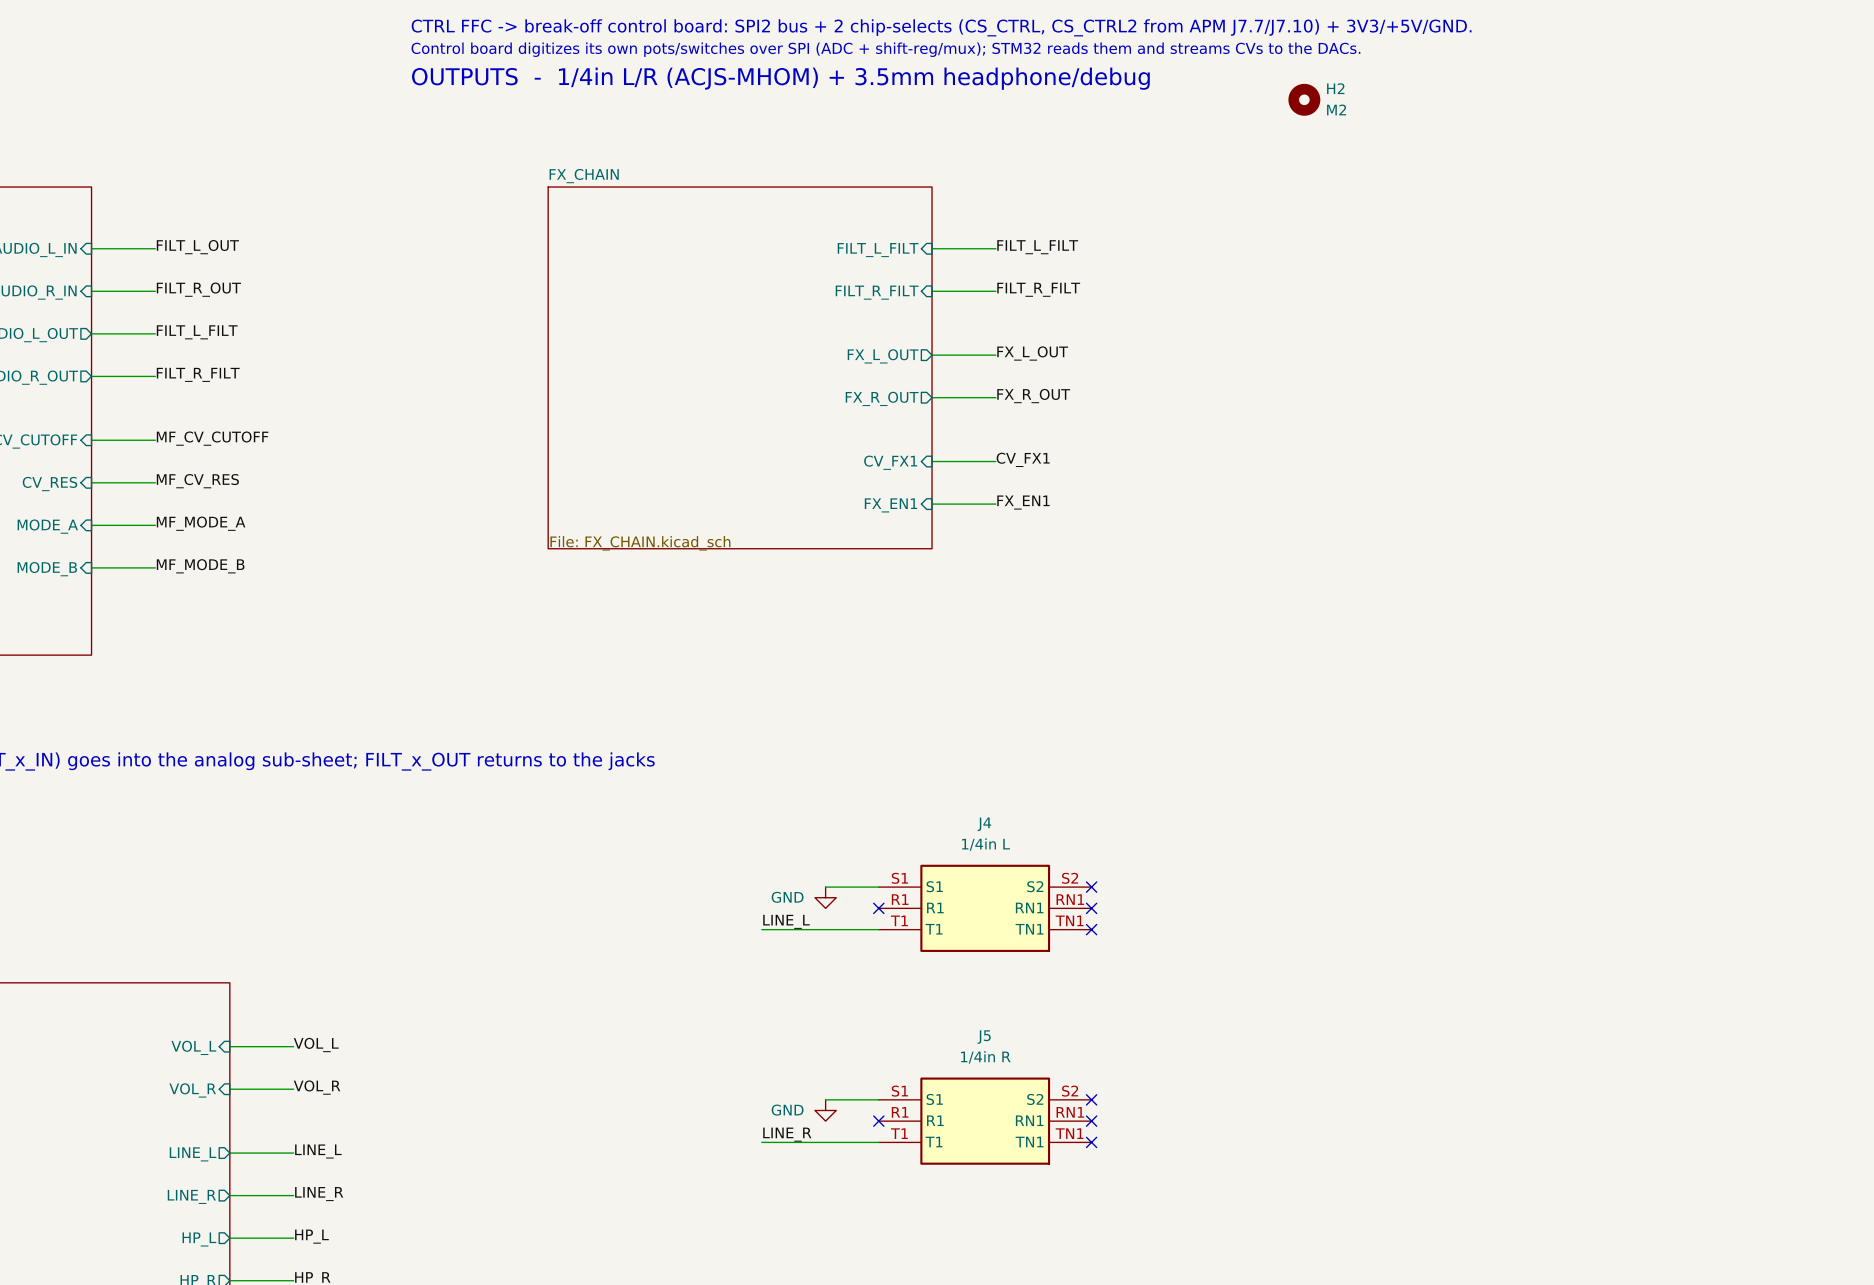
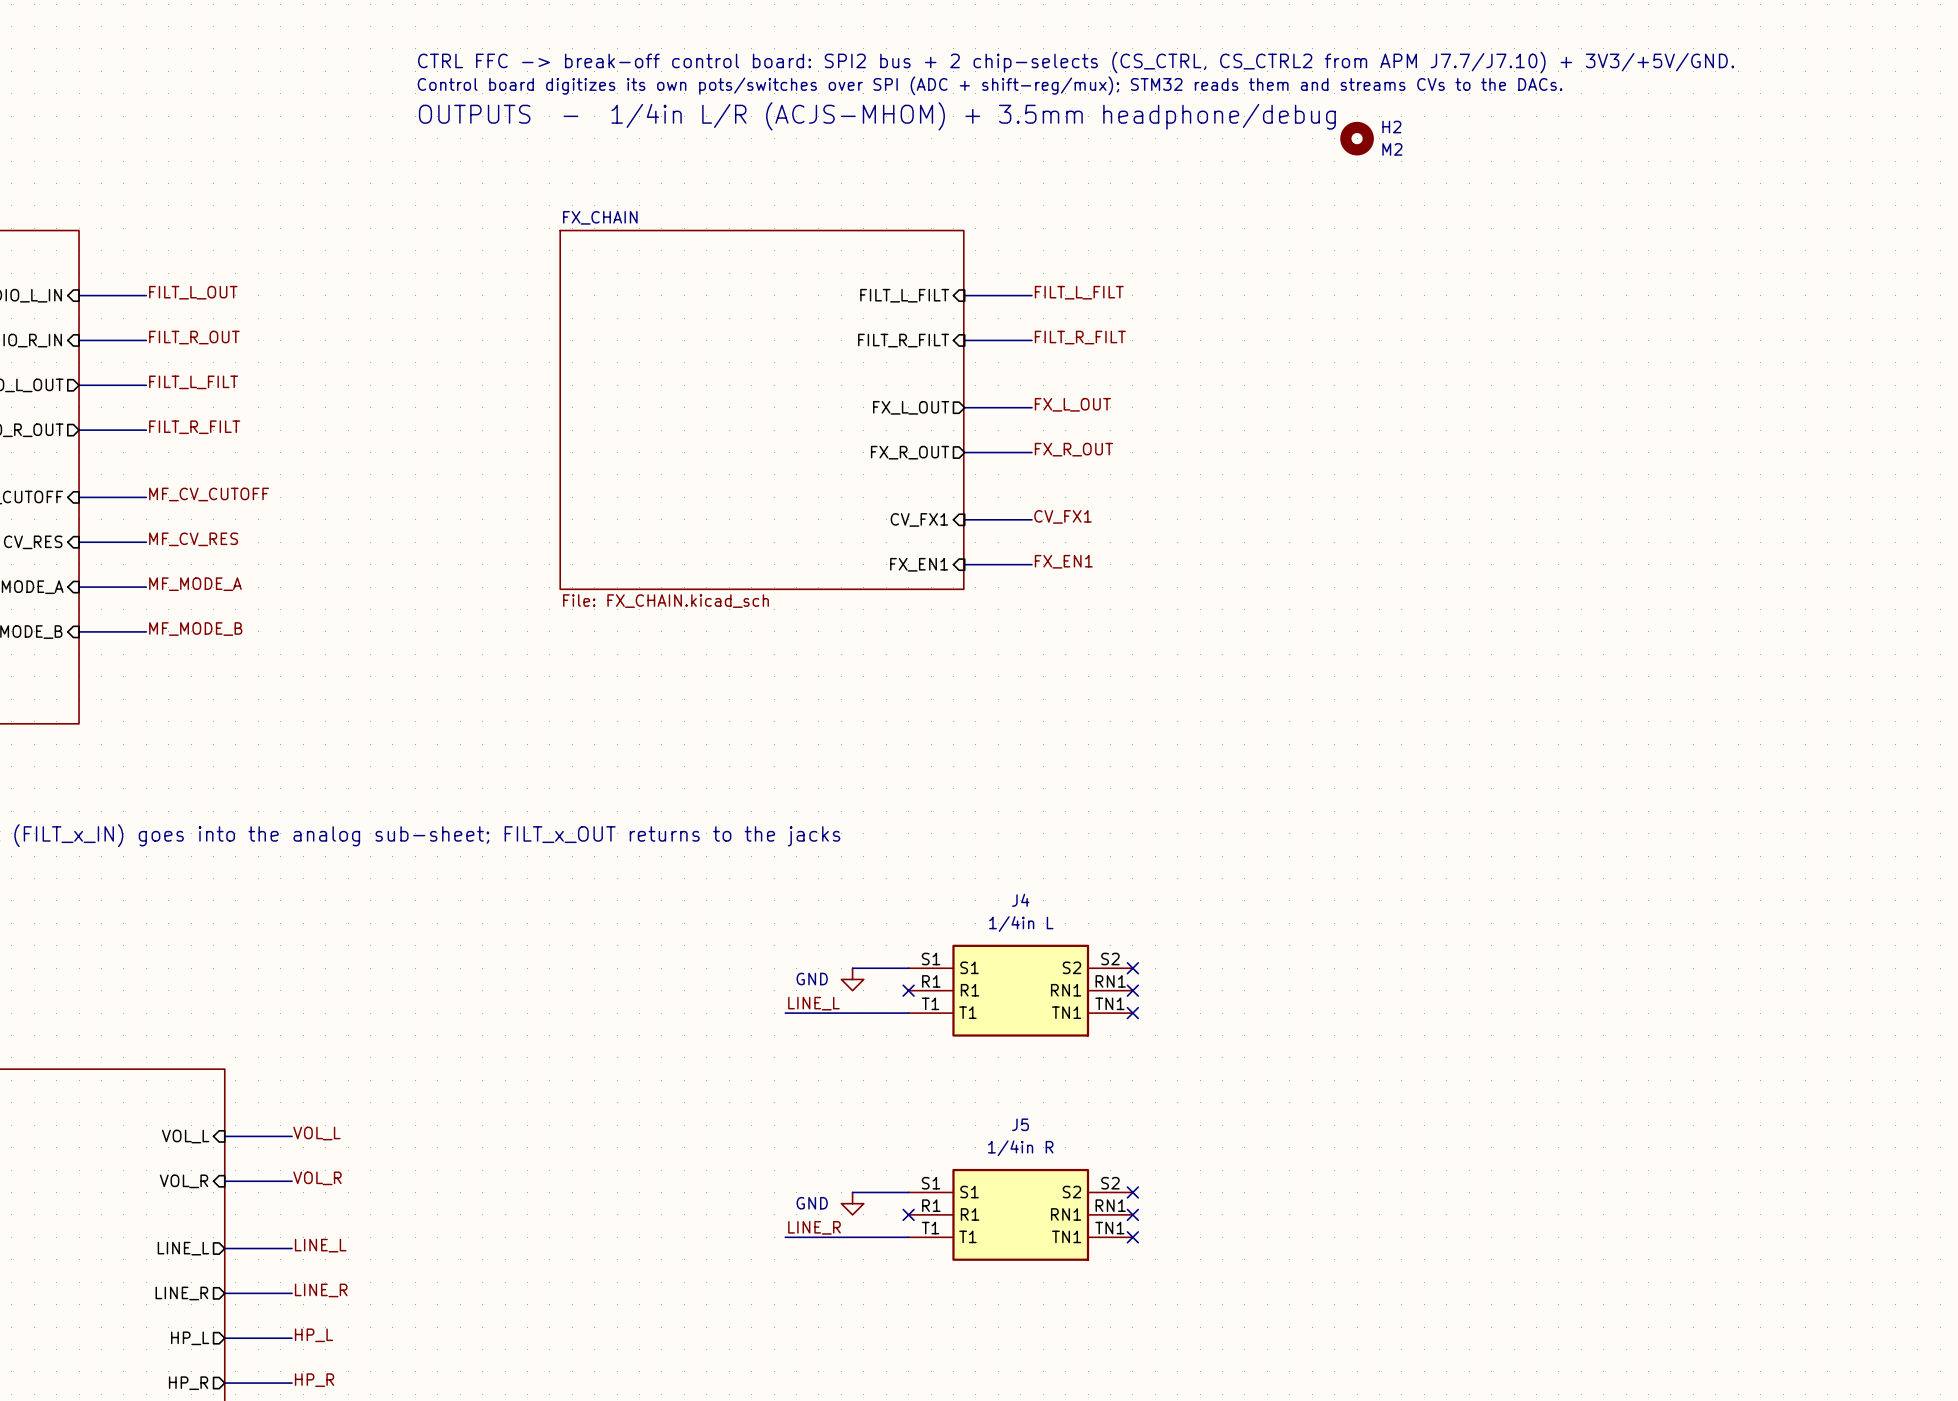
sheet FX_CHAIN: none -> File: FX_CHAIN.kicad_sch (762, 409)
sheet FX_CHAIN: File: FX_CHAIN.kicad_sch (740, 367) -> none

